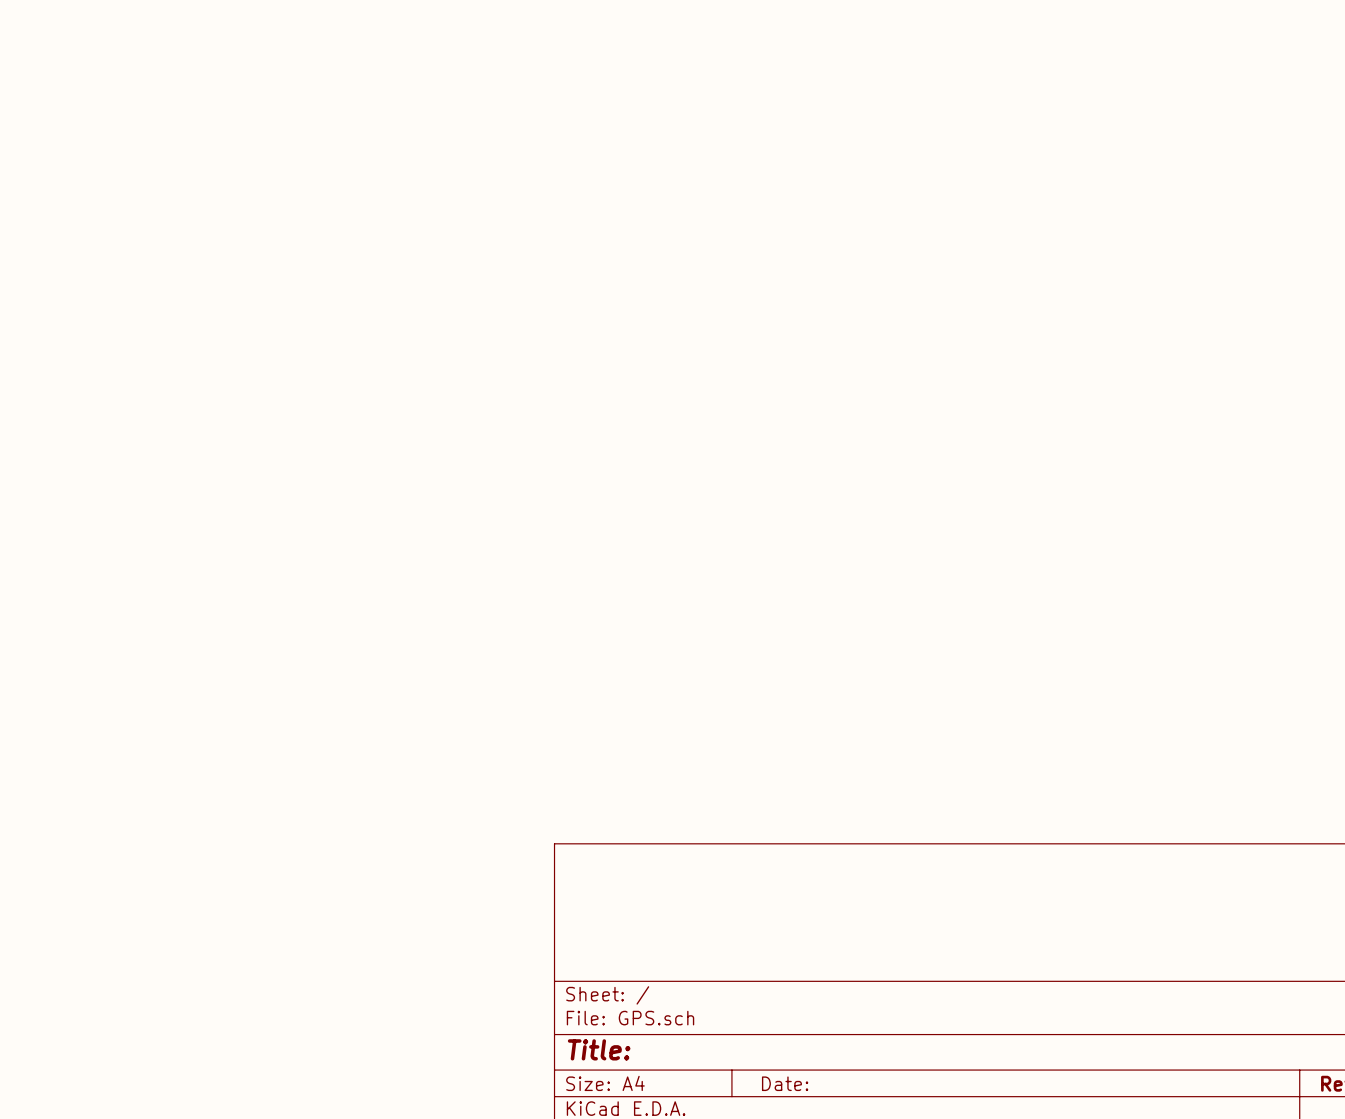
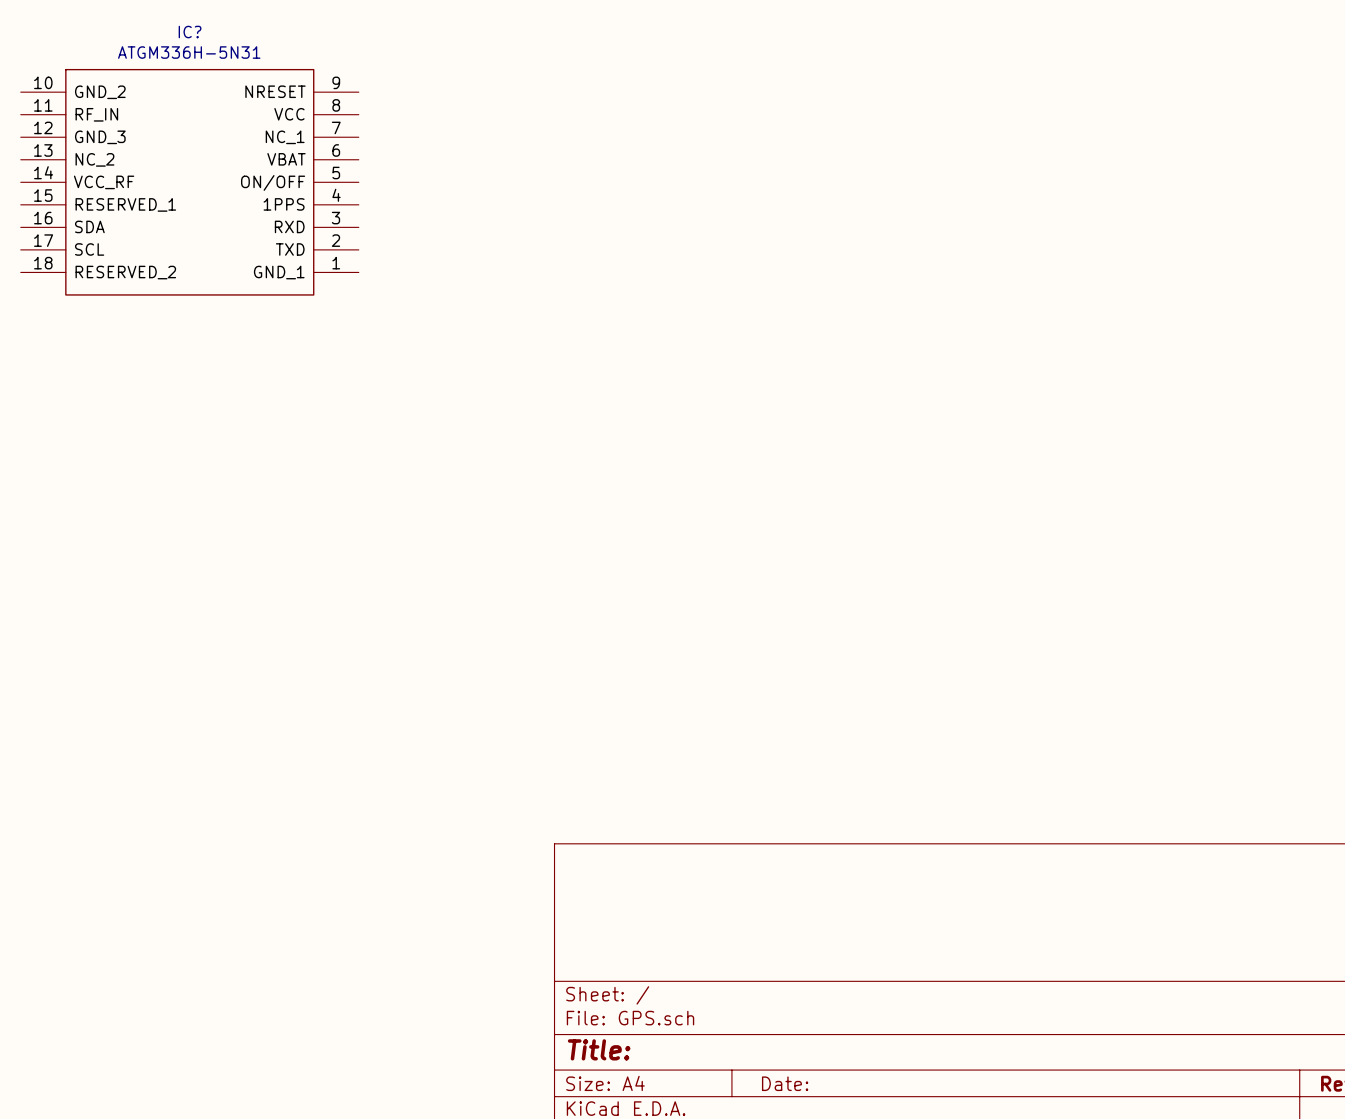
IC?: none -> ATGM336H-5N31 (189, 182)

